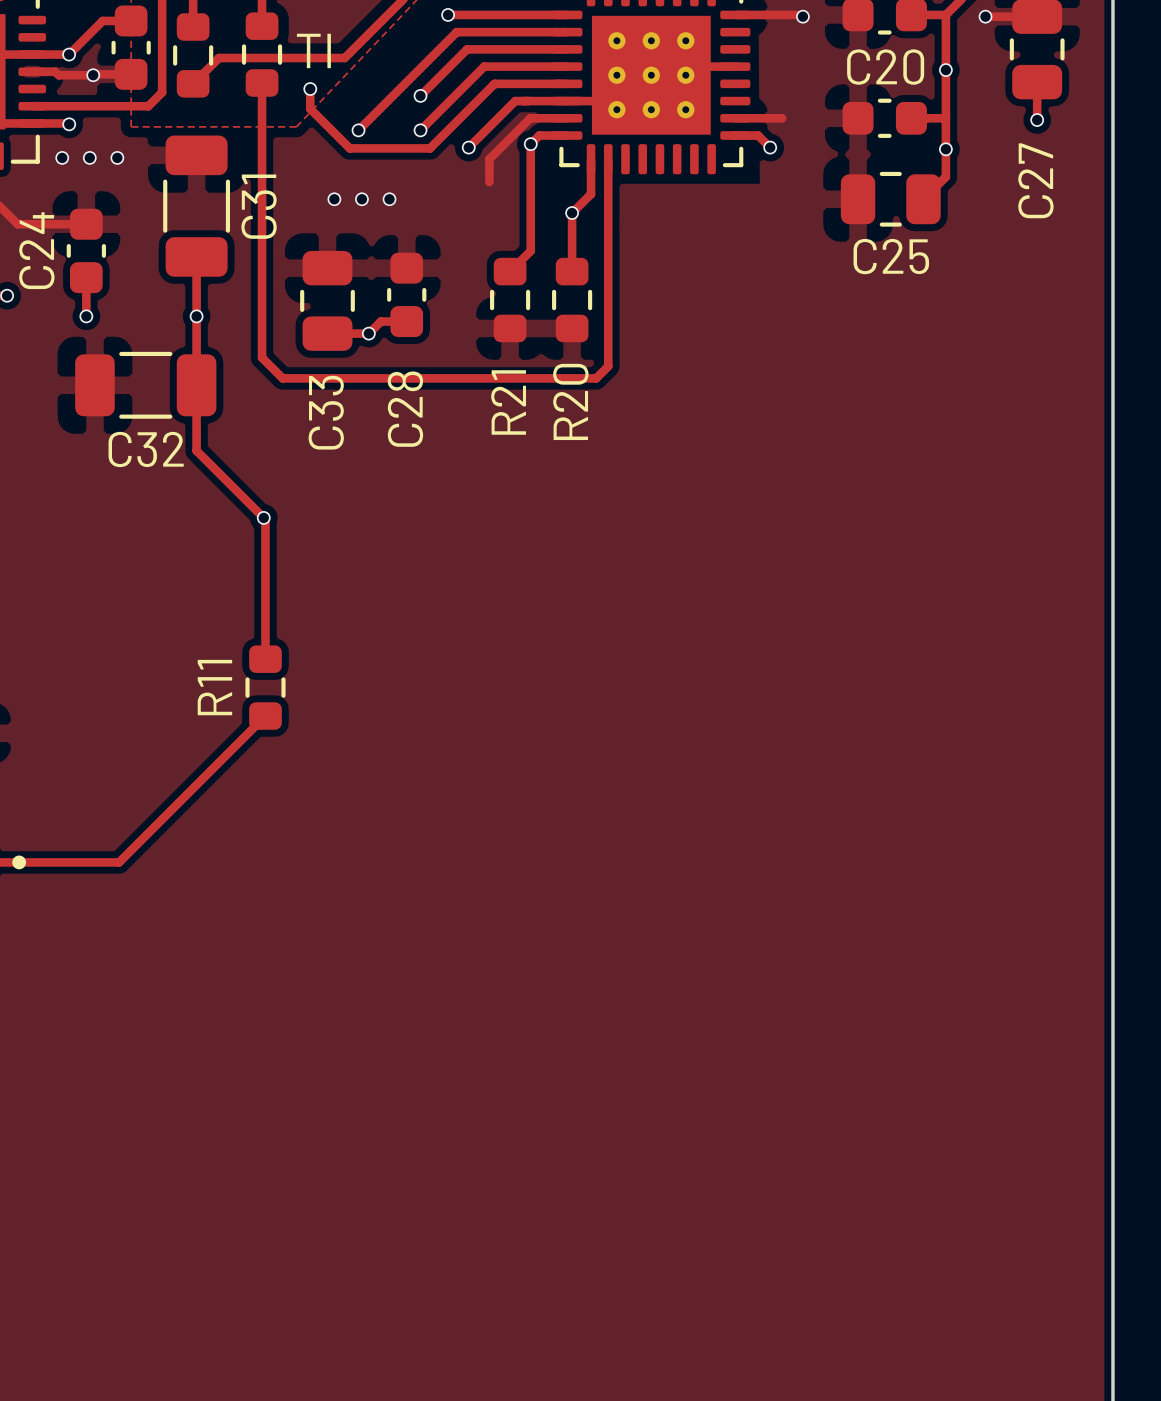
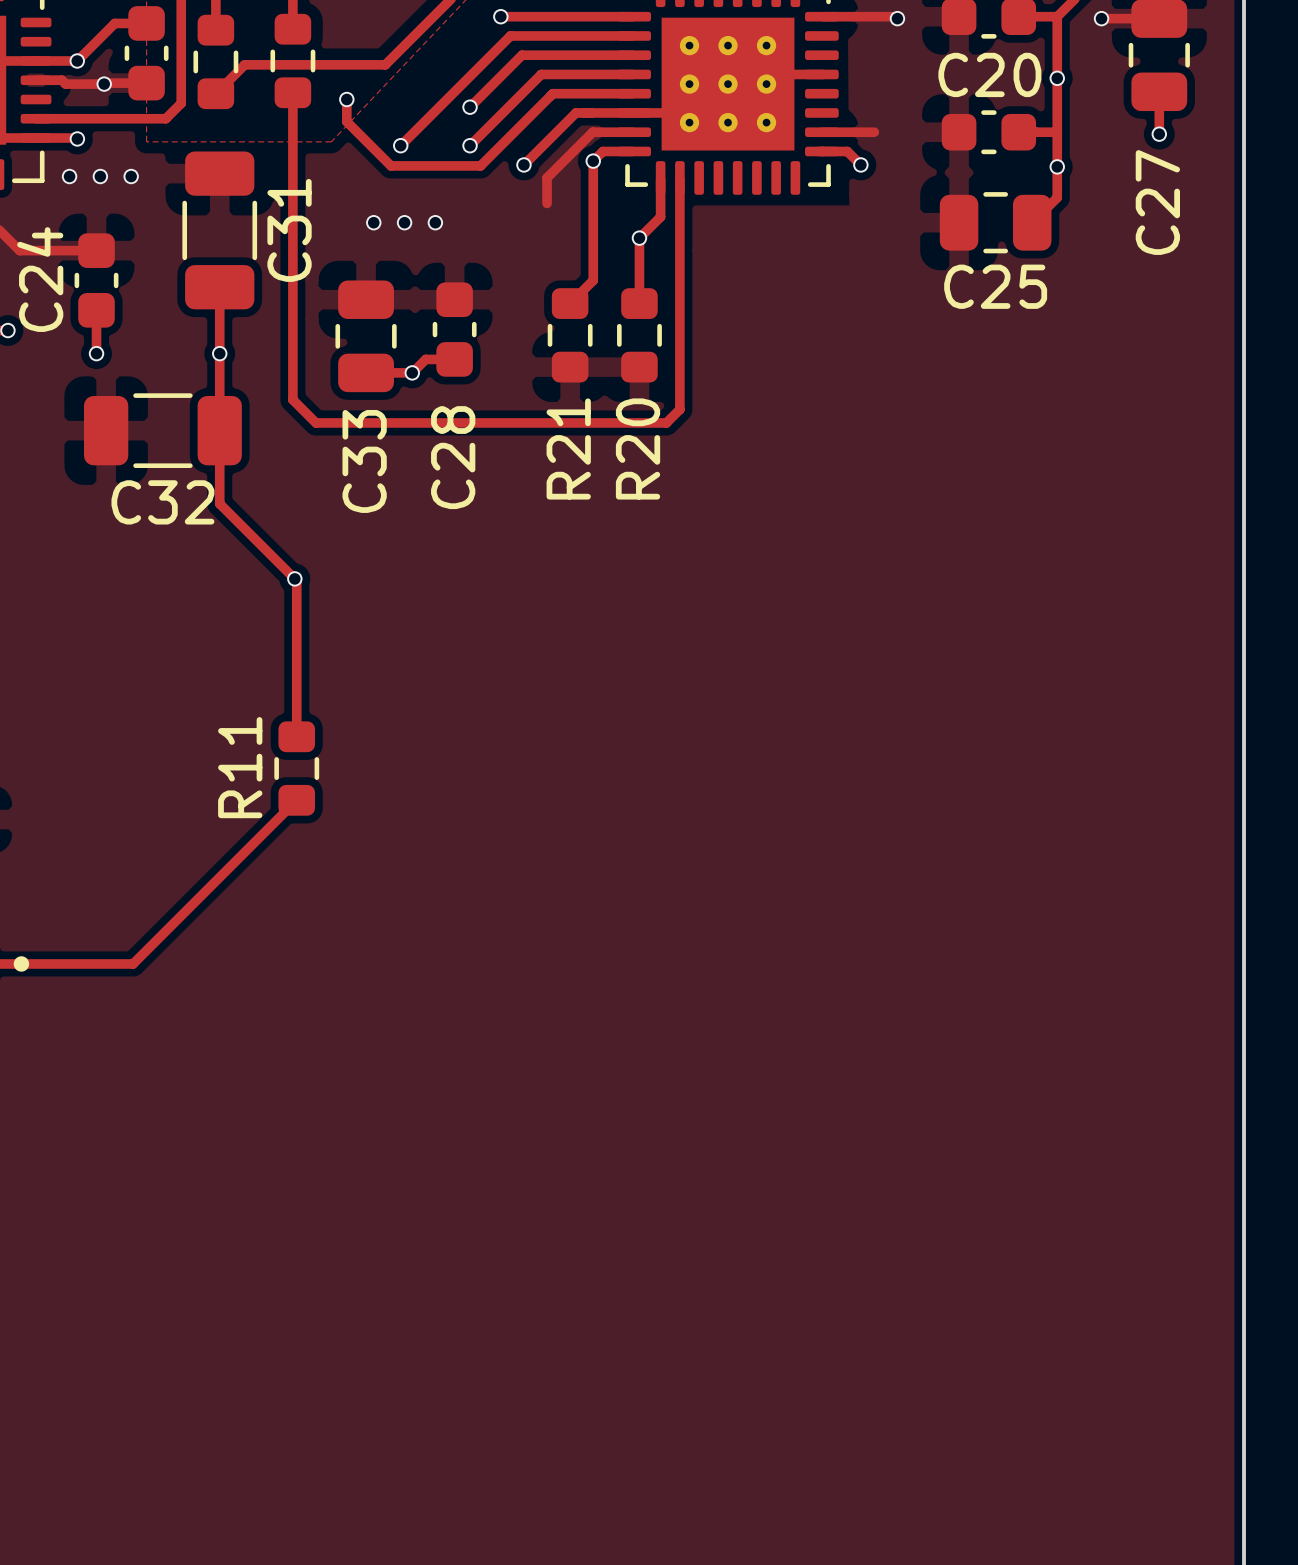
text: TI (313, 50) -> none

